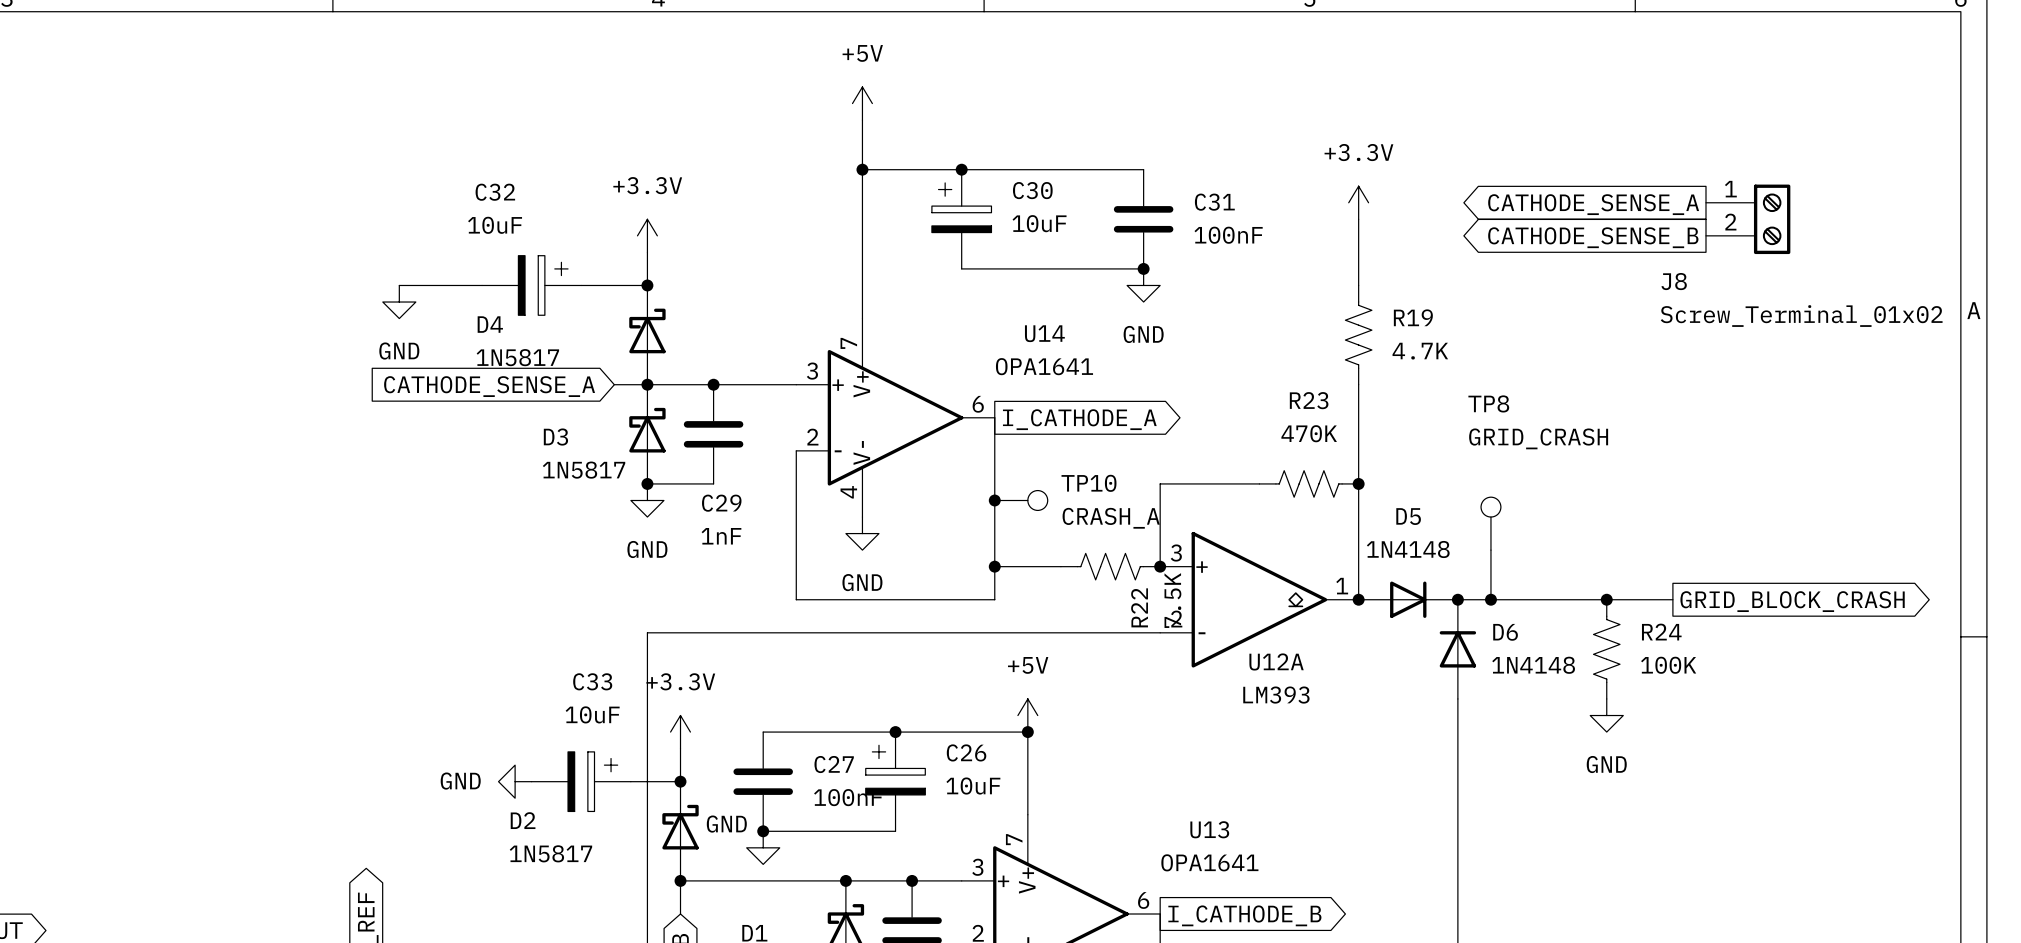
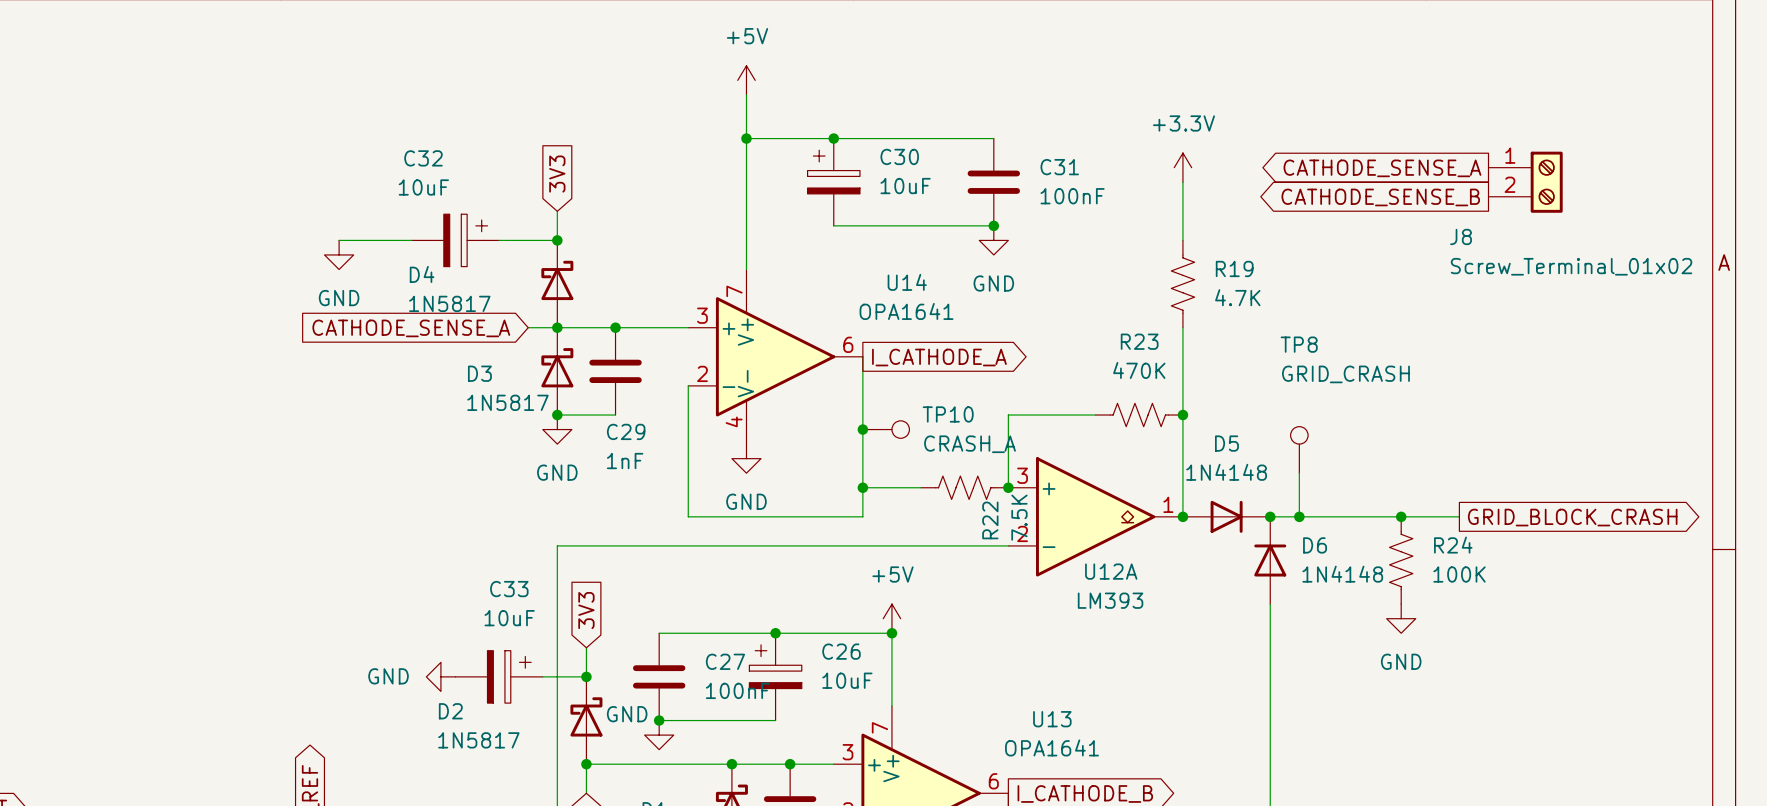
global label: none -> 3V3 (557, 174)
power symbol: +3.3V (647, 235) -> none
global label: none -> 3V3 (586, 610)
power symbol: +3.3V (680, 732) -> none

